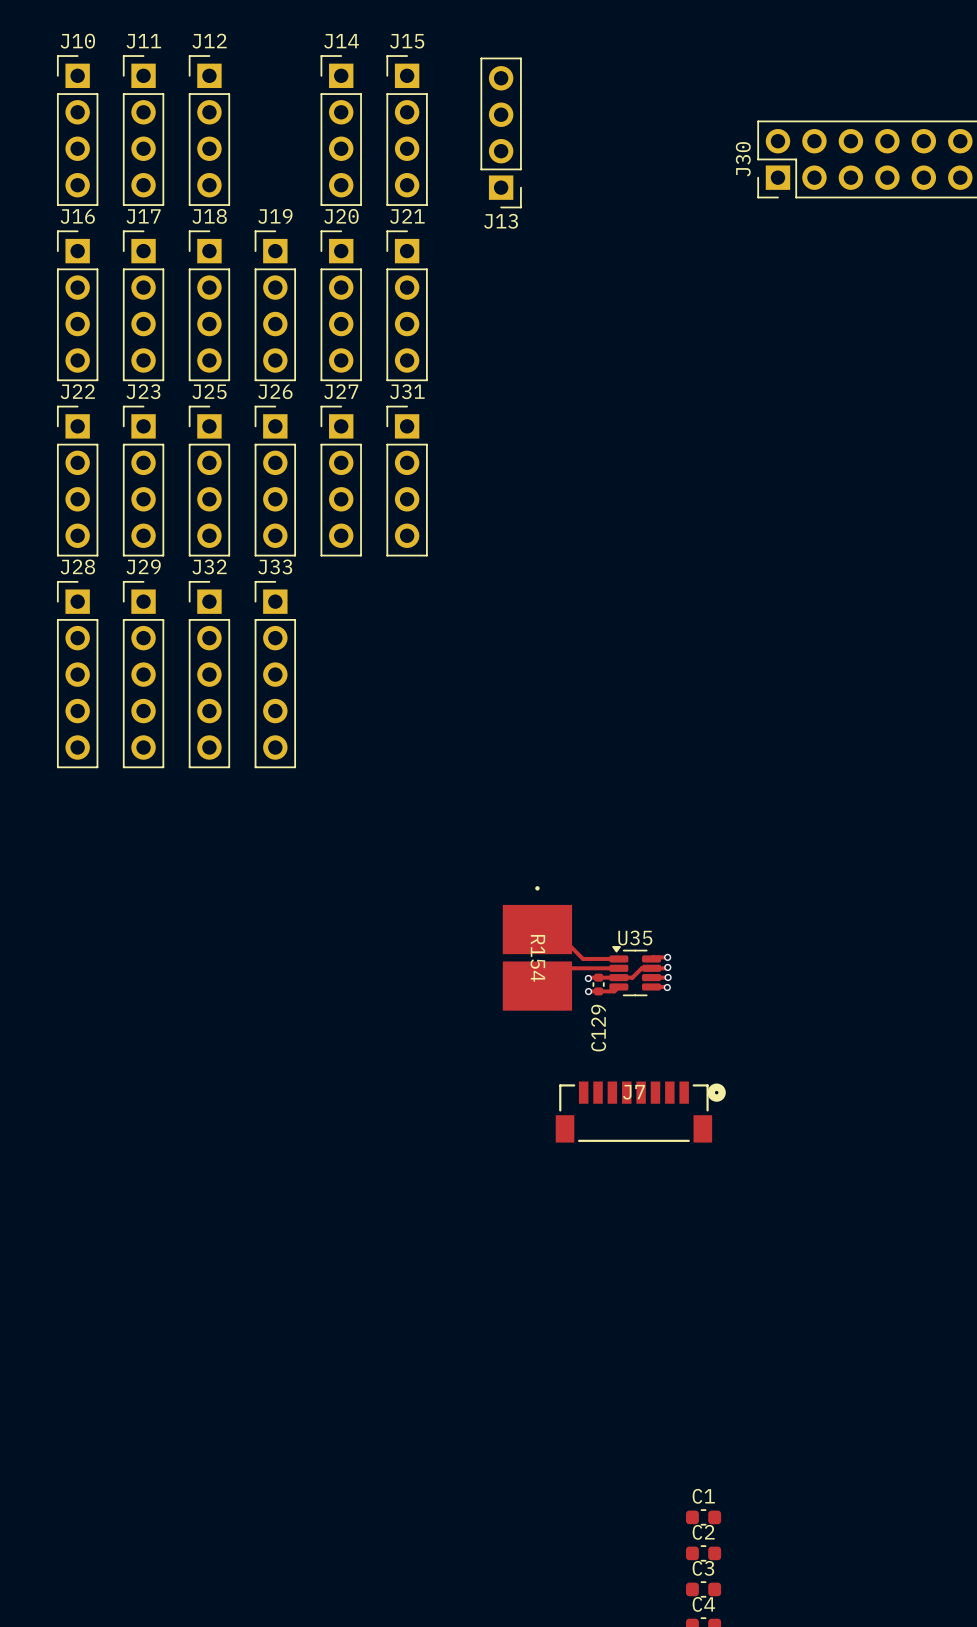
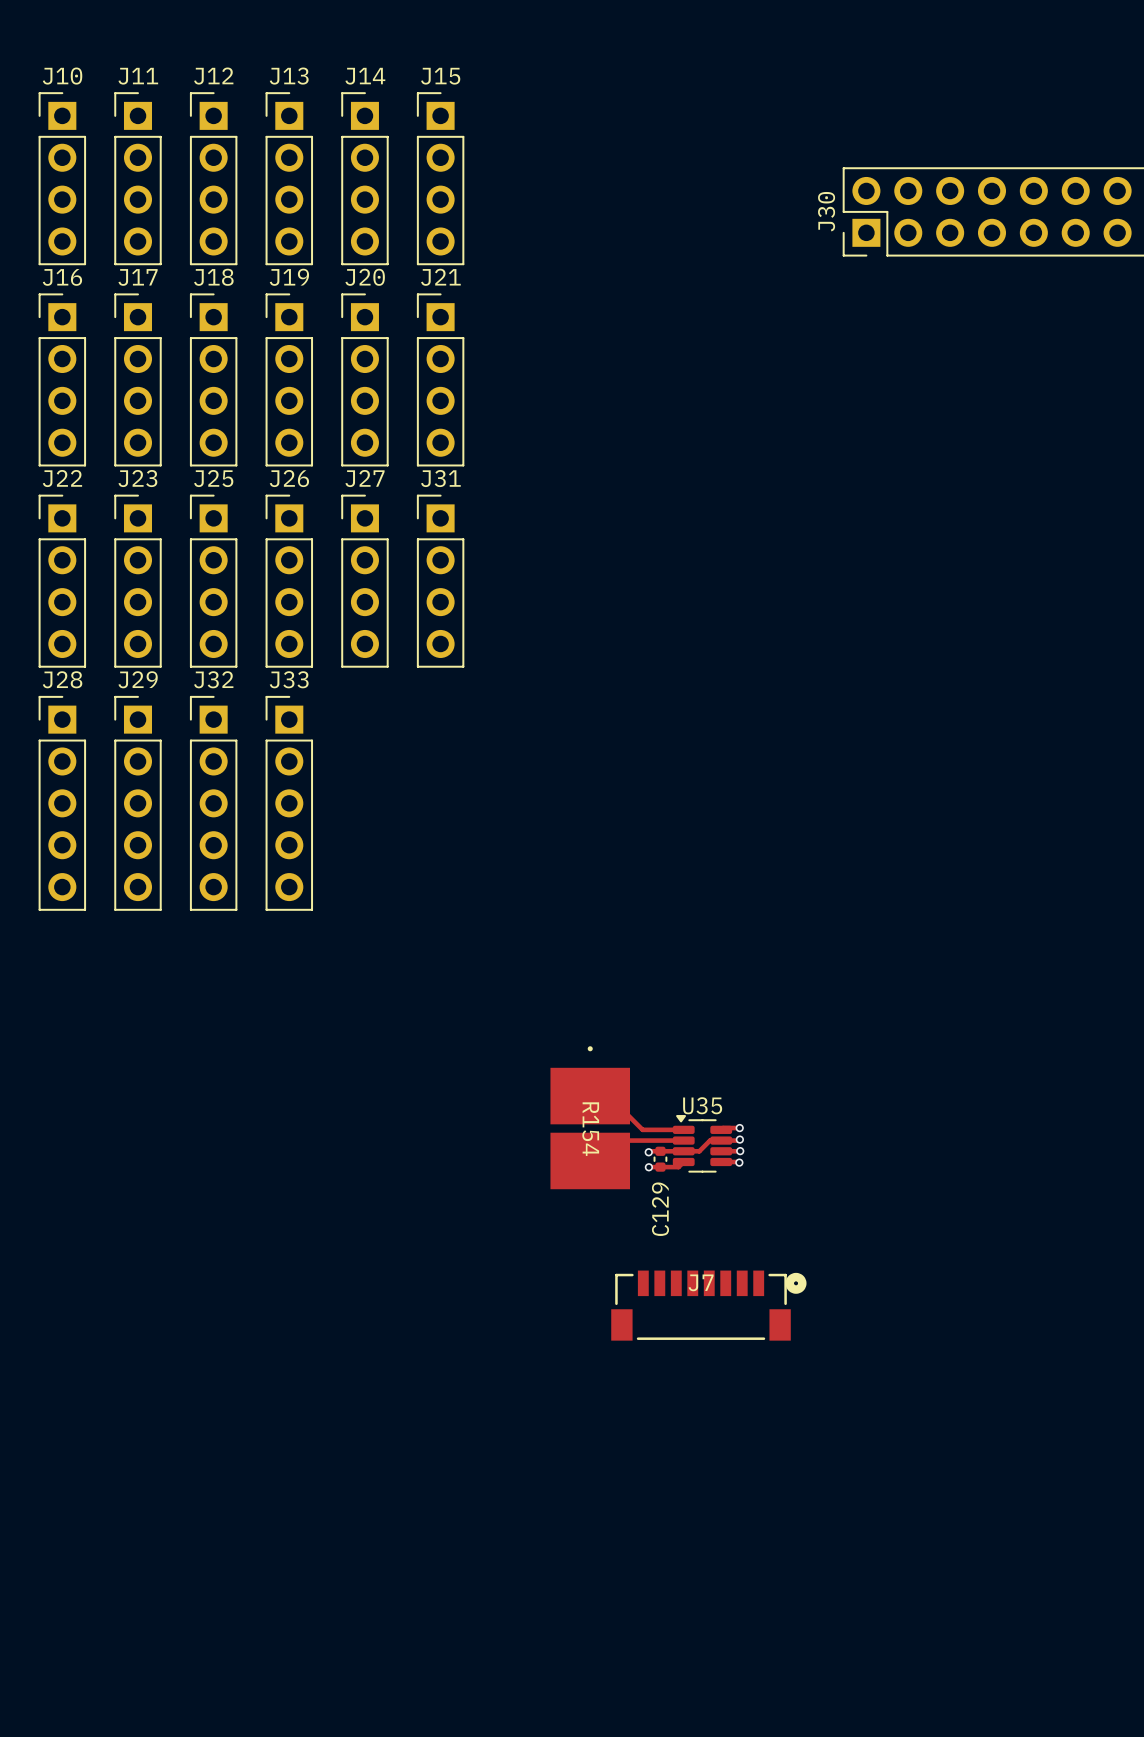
J13 rotation: 0° (501, 132) -> 180° (289, 178)
J13 position: (501, 132) -> (289, 178)

